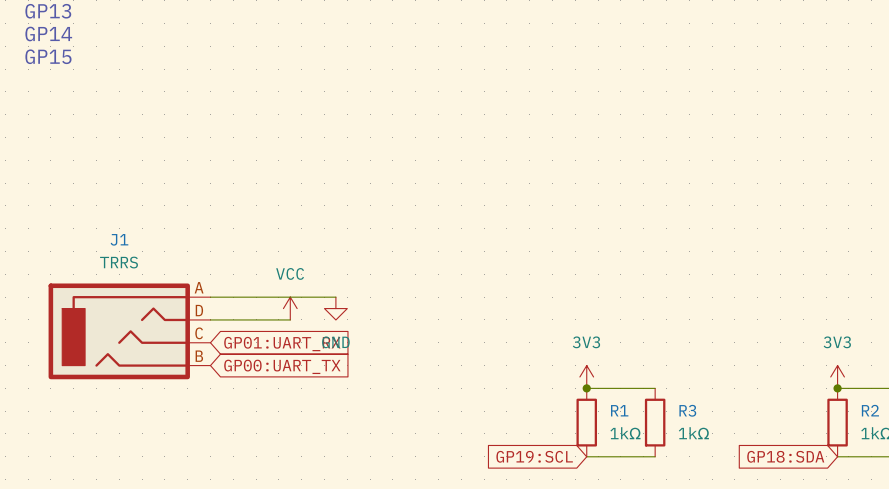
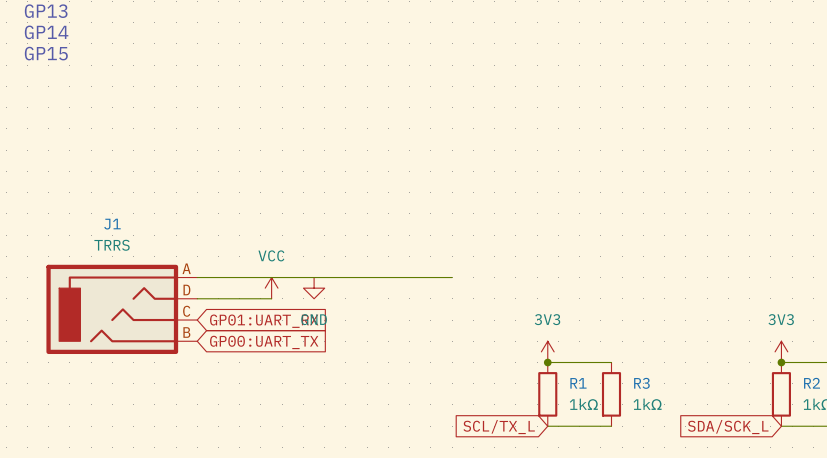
wire: none -> (314, 277) (452, 277)
global label: GP19:SCL (534, 456) -> SCL/TX_L (499, 427)
global label: GP18:SDA (785, 456) -> SDA/SCK_L (728, 427)

